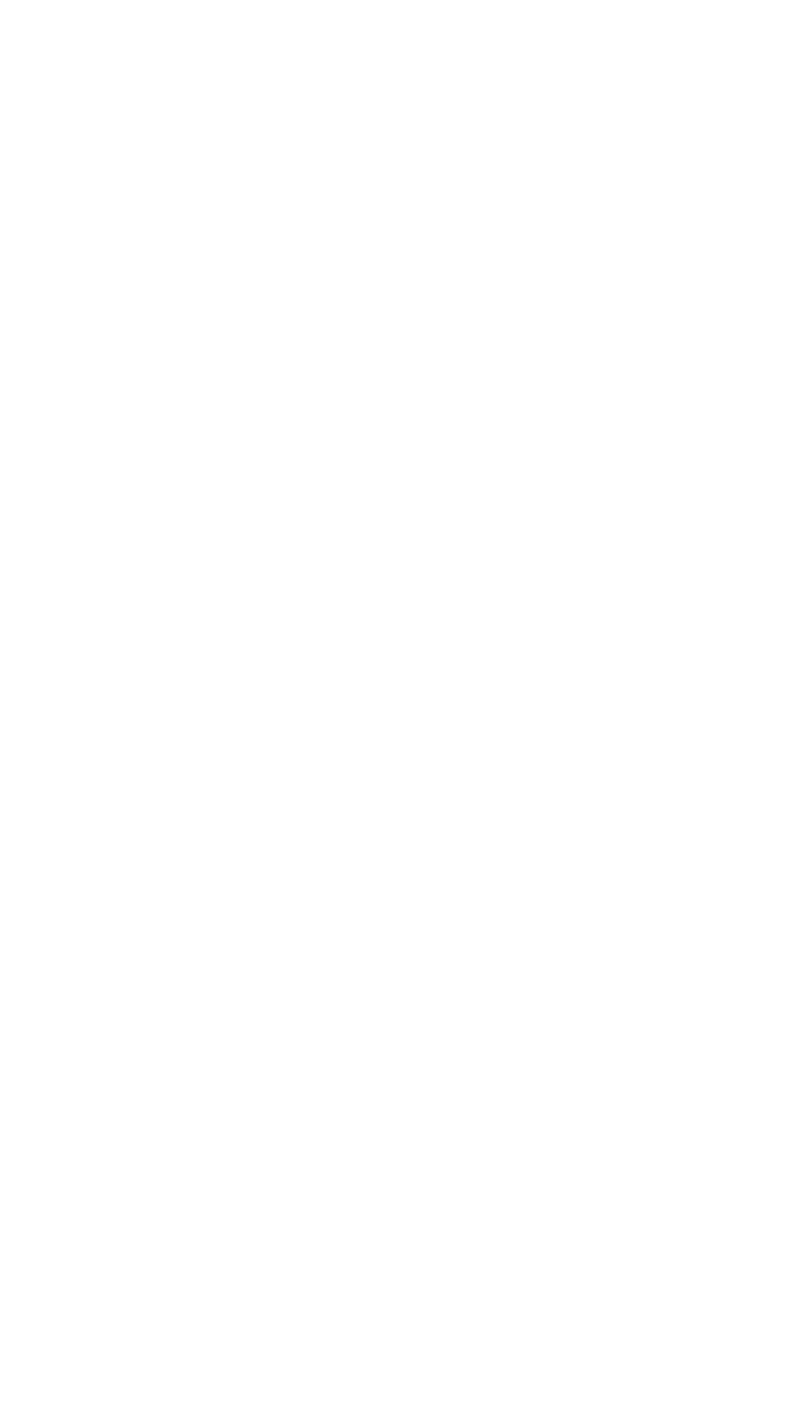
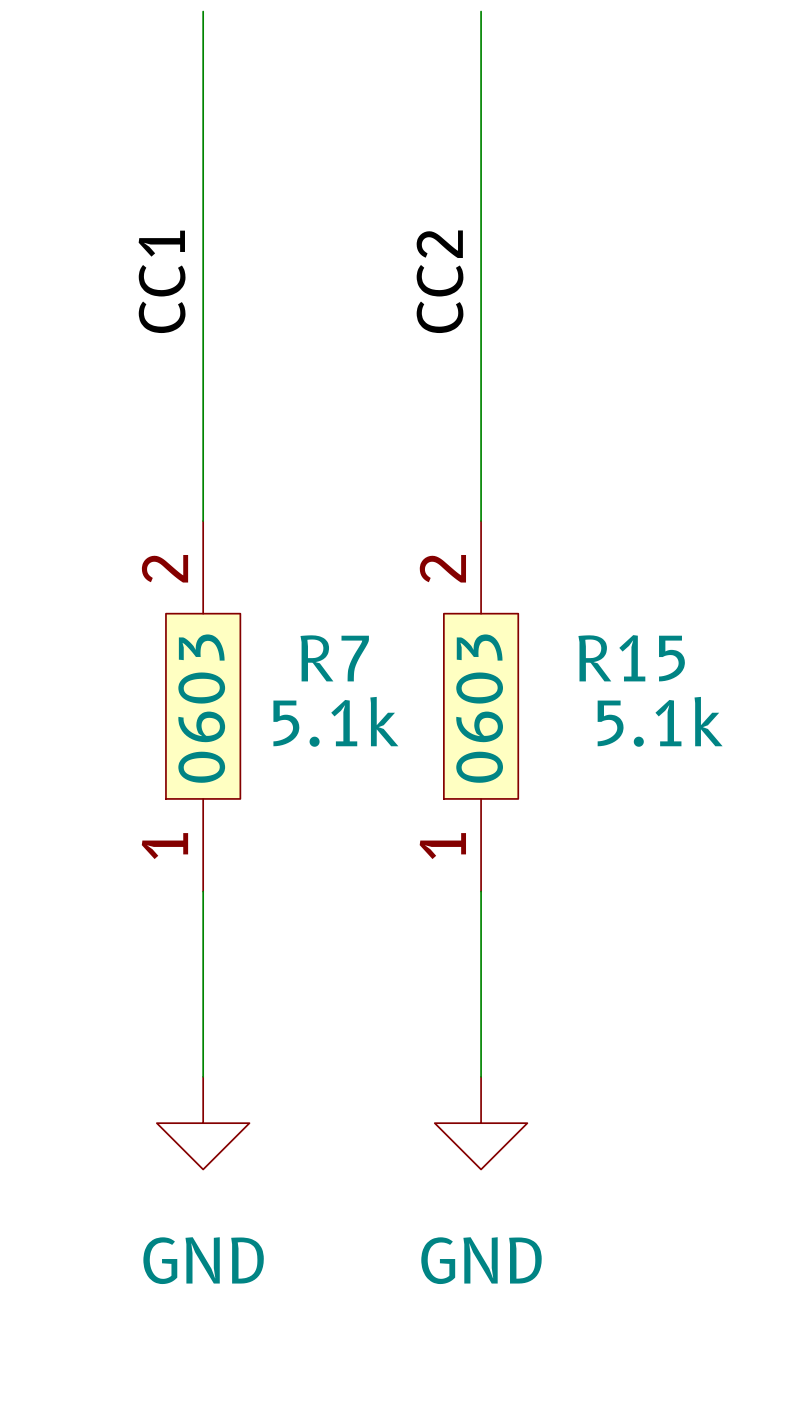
wire: none -> (203, 11) (203, 521)
wire: none -> (481, 11) (481, 521)
label: none -> CC1 (162, 281)
label: none -> CC2 (440, 281)
R7: none -> (203, 706)
R15: none -> (481, 706)
wire: none -> (203, 891) (203, 1076)
wire: none -> (481, 891) (481, 1076)
power symbol: none -> GND (203, 1123)
power symbol: none -> GND (481, 1123)

